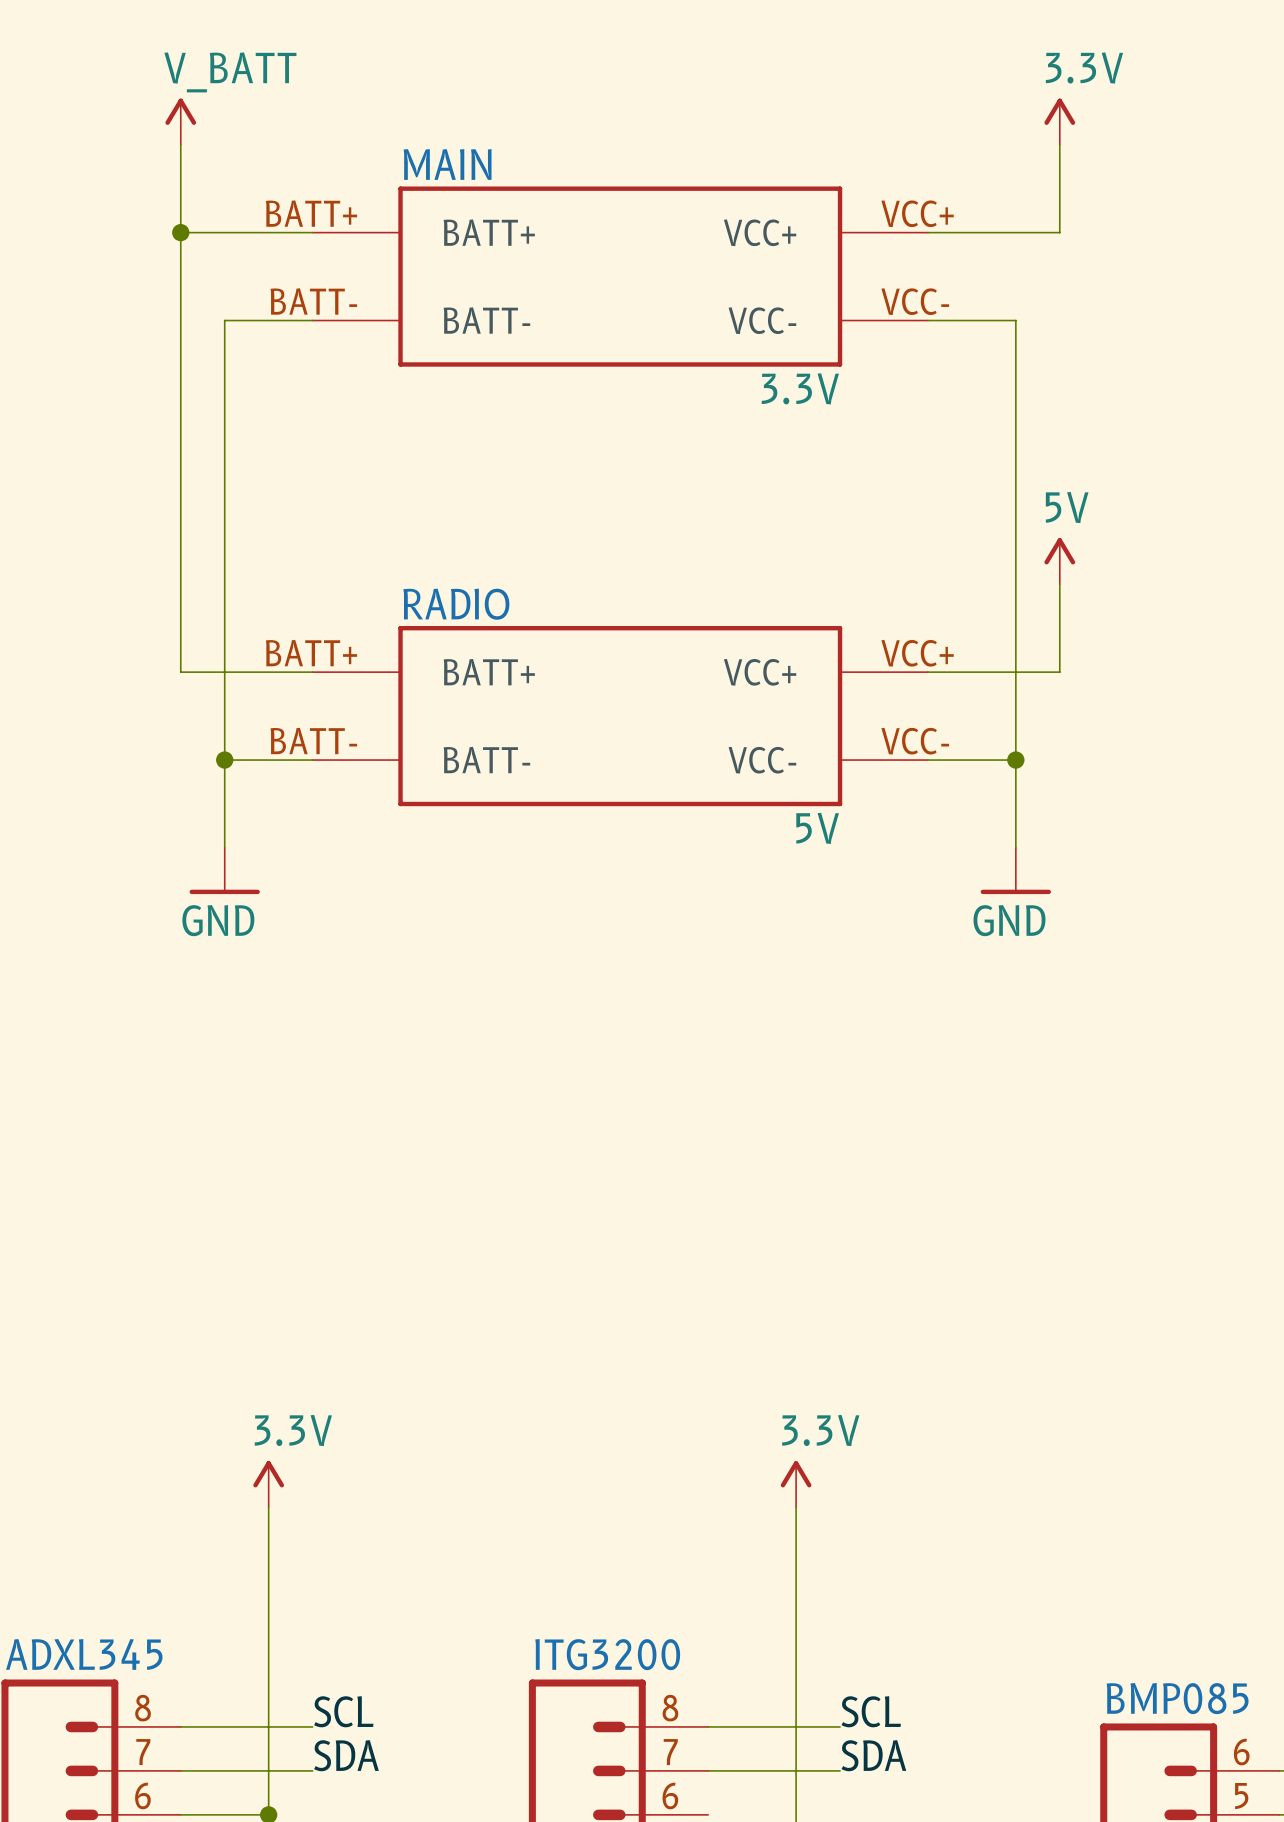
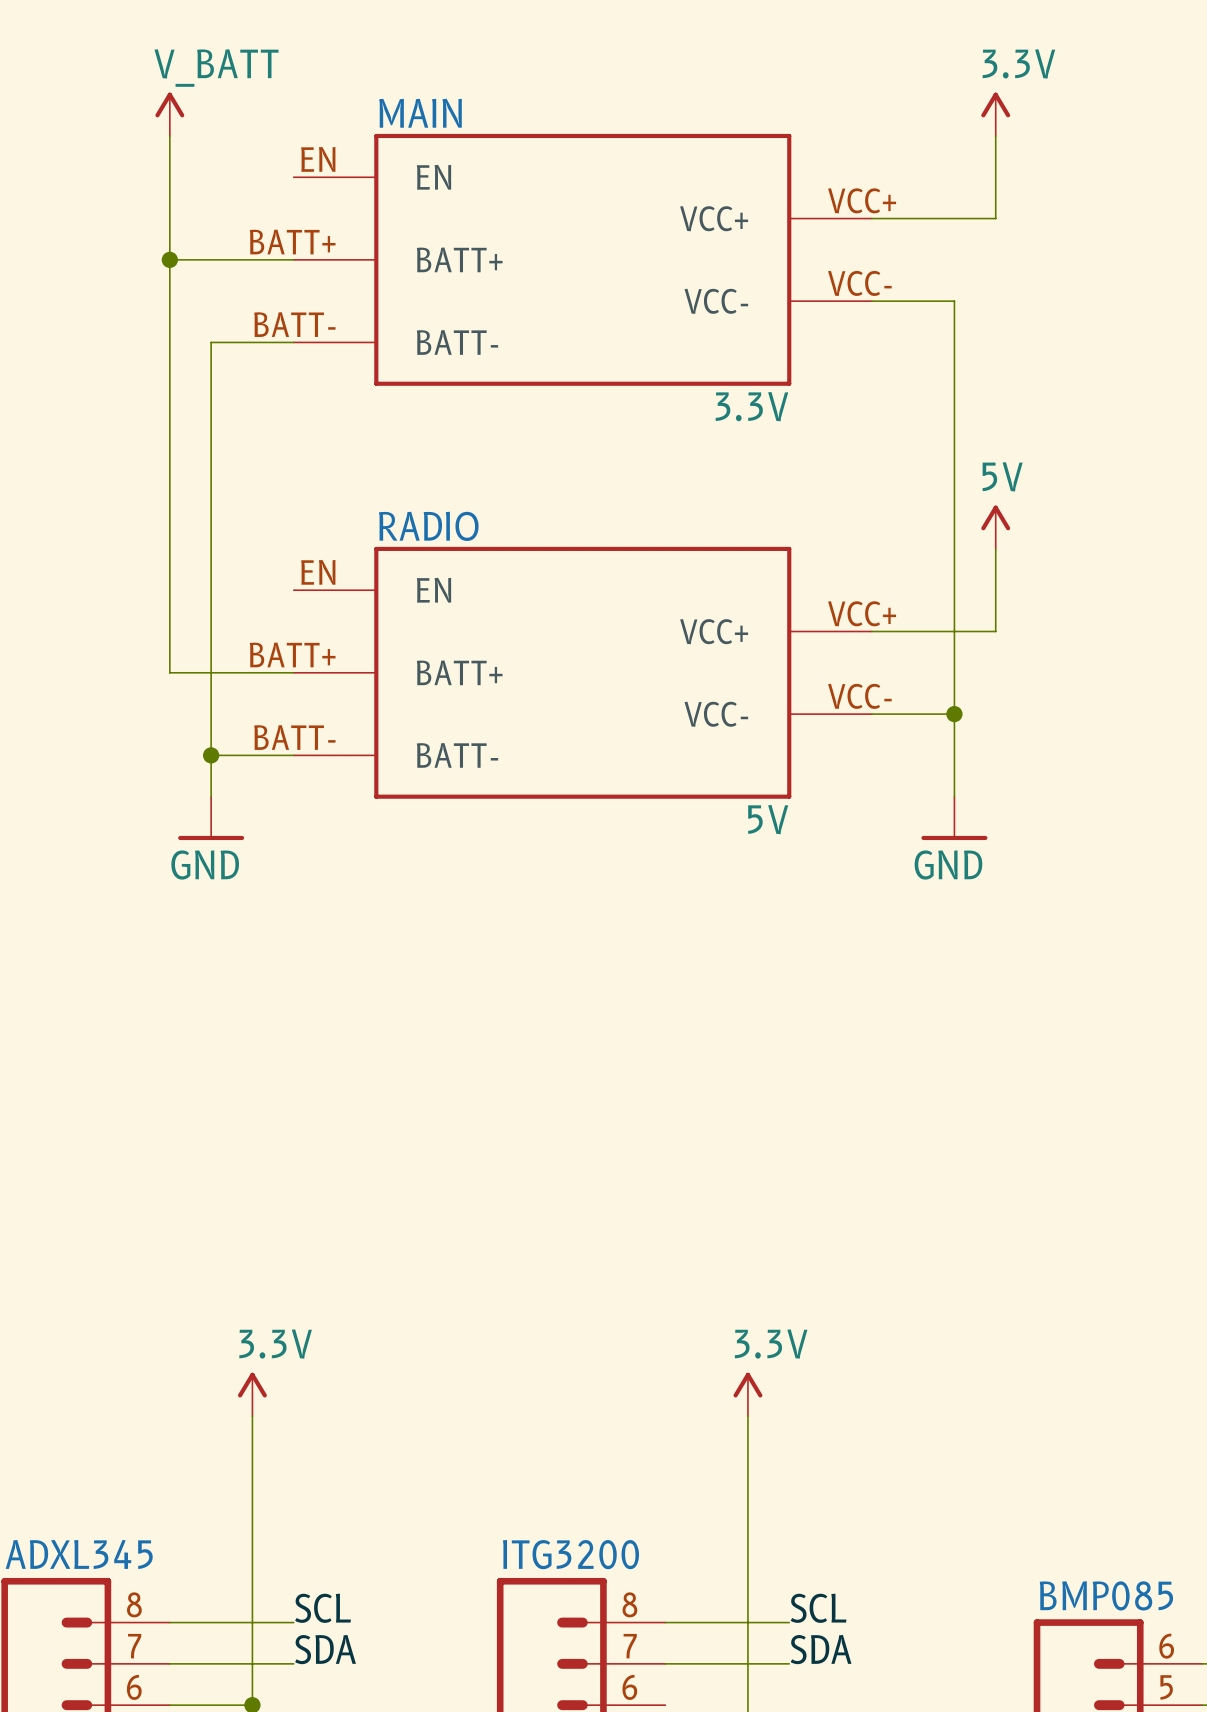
MAIN name position: MAIN (447, 164) -> MAIN (420, 113)
MAIN symbol: [312, 186, 928, 367] -> [293, 133, 872, 386]
wire: (180, 232) (312, 232) -> (169, 259) (293, 259)
junction position: (180, 232) -> (169, 259)
wire: (312, 320) (224, 320) (224, 364) -> (293, 342) (211, 342)
MAIN value position: 3.3V (800, 388) -> 3.3V (751, 406)
RADIO name position: RADIO (456, 604) -> RADIO (428, 526)
RADIO symbol: [312, 625, 928, 807] -> [293, 546, 872, 799]
wire: (180, 672) (312, 672) -> (169, 631) (169, 672) (293, 672)
wire: (224, 760) (312, 760) -> (211, 755) (293, 755)
junction position: (224, 760) -> (211, 755)
RADIO value position: 5V (817, 828) -> 5V (768, 819)

